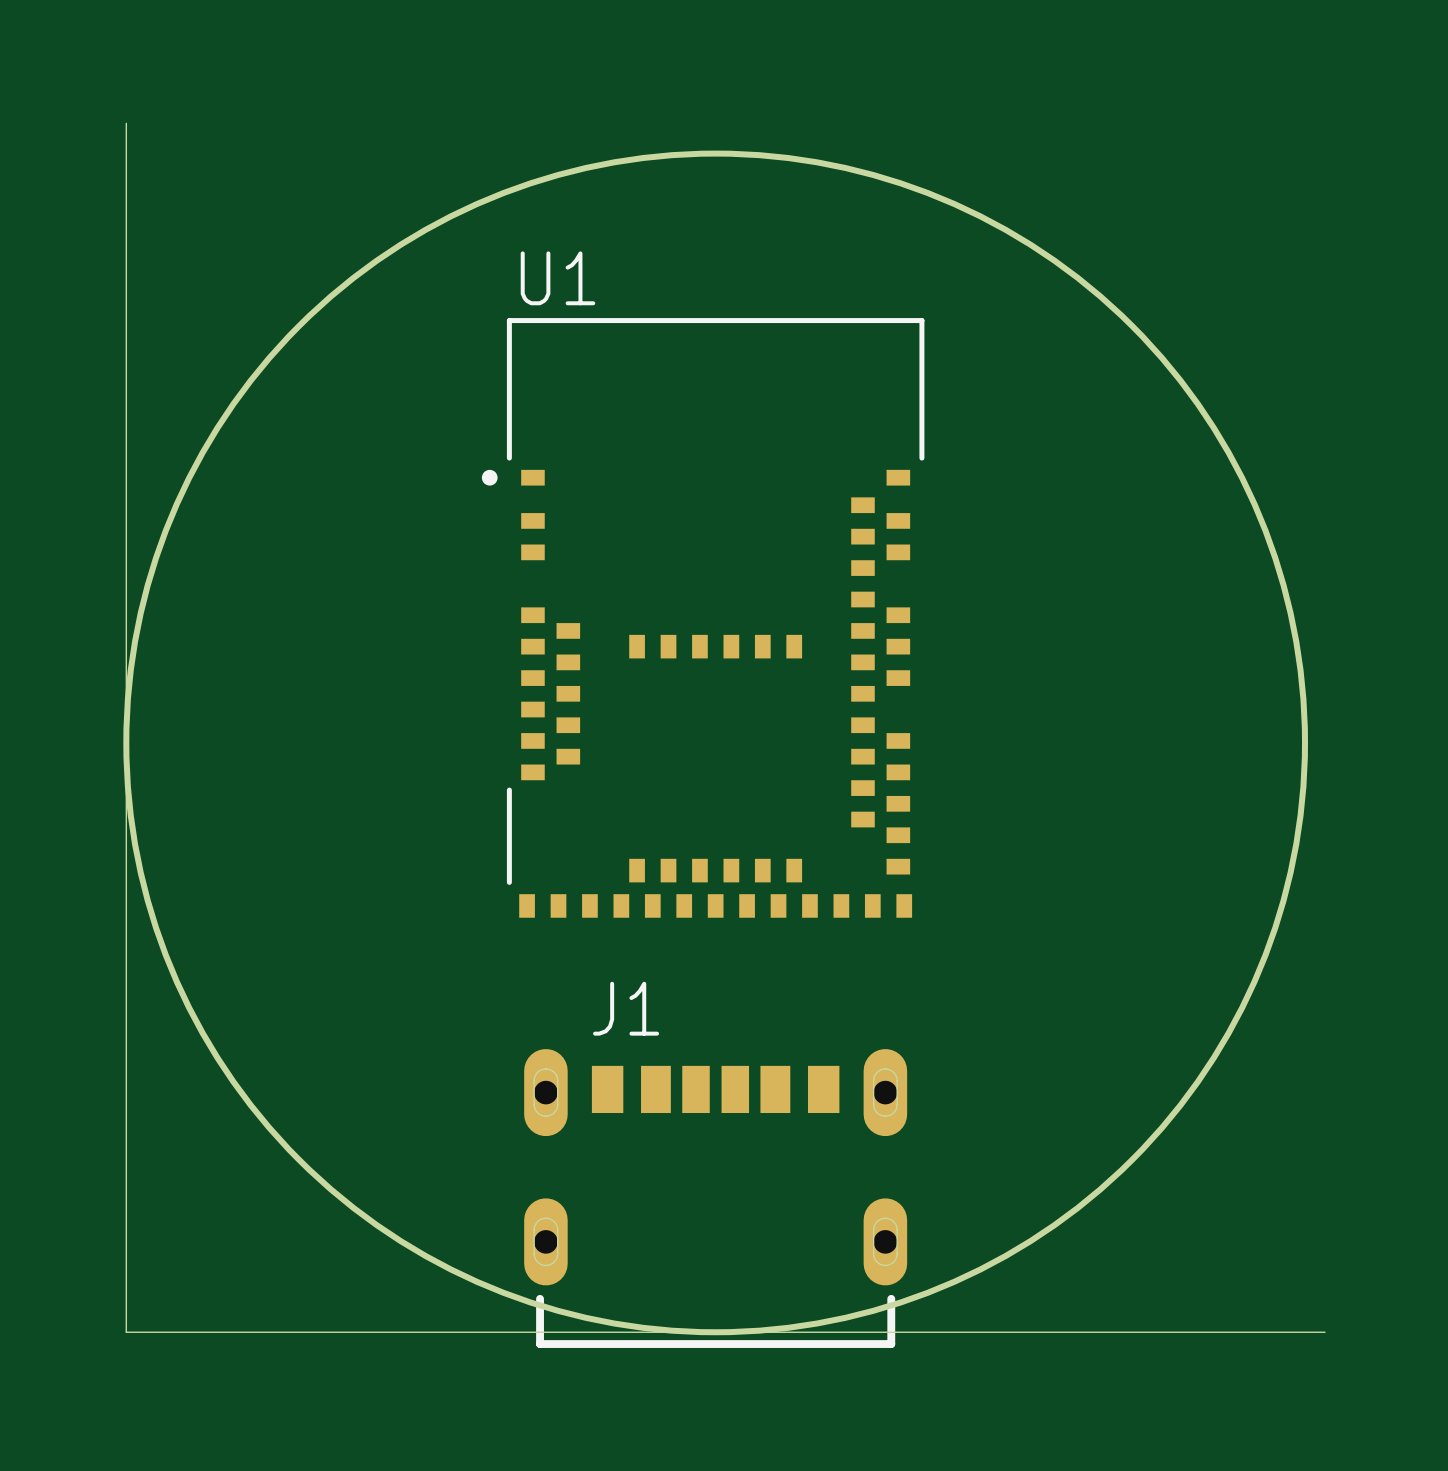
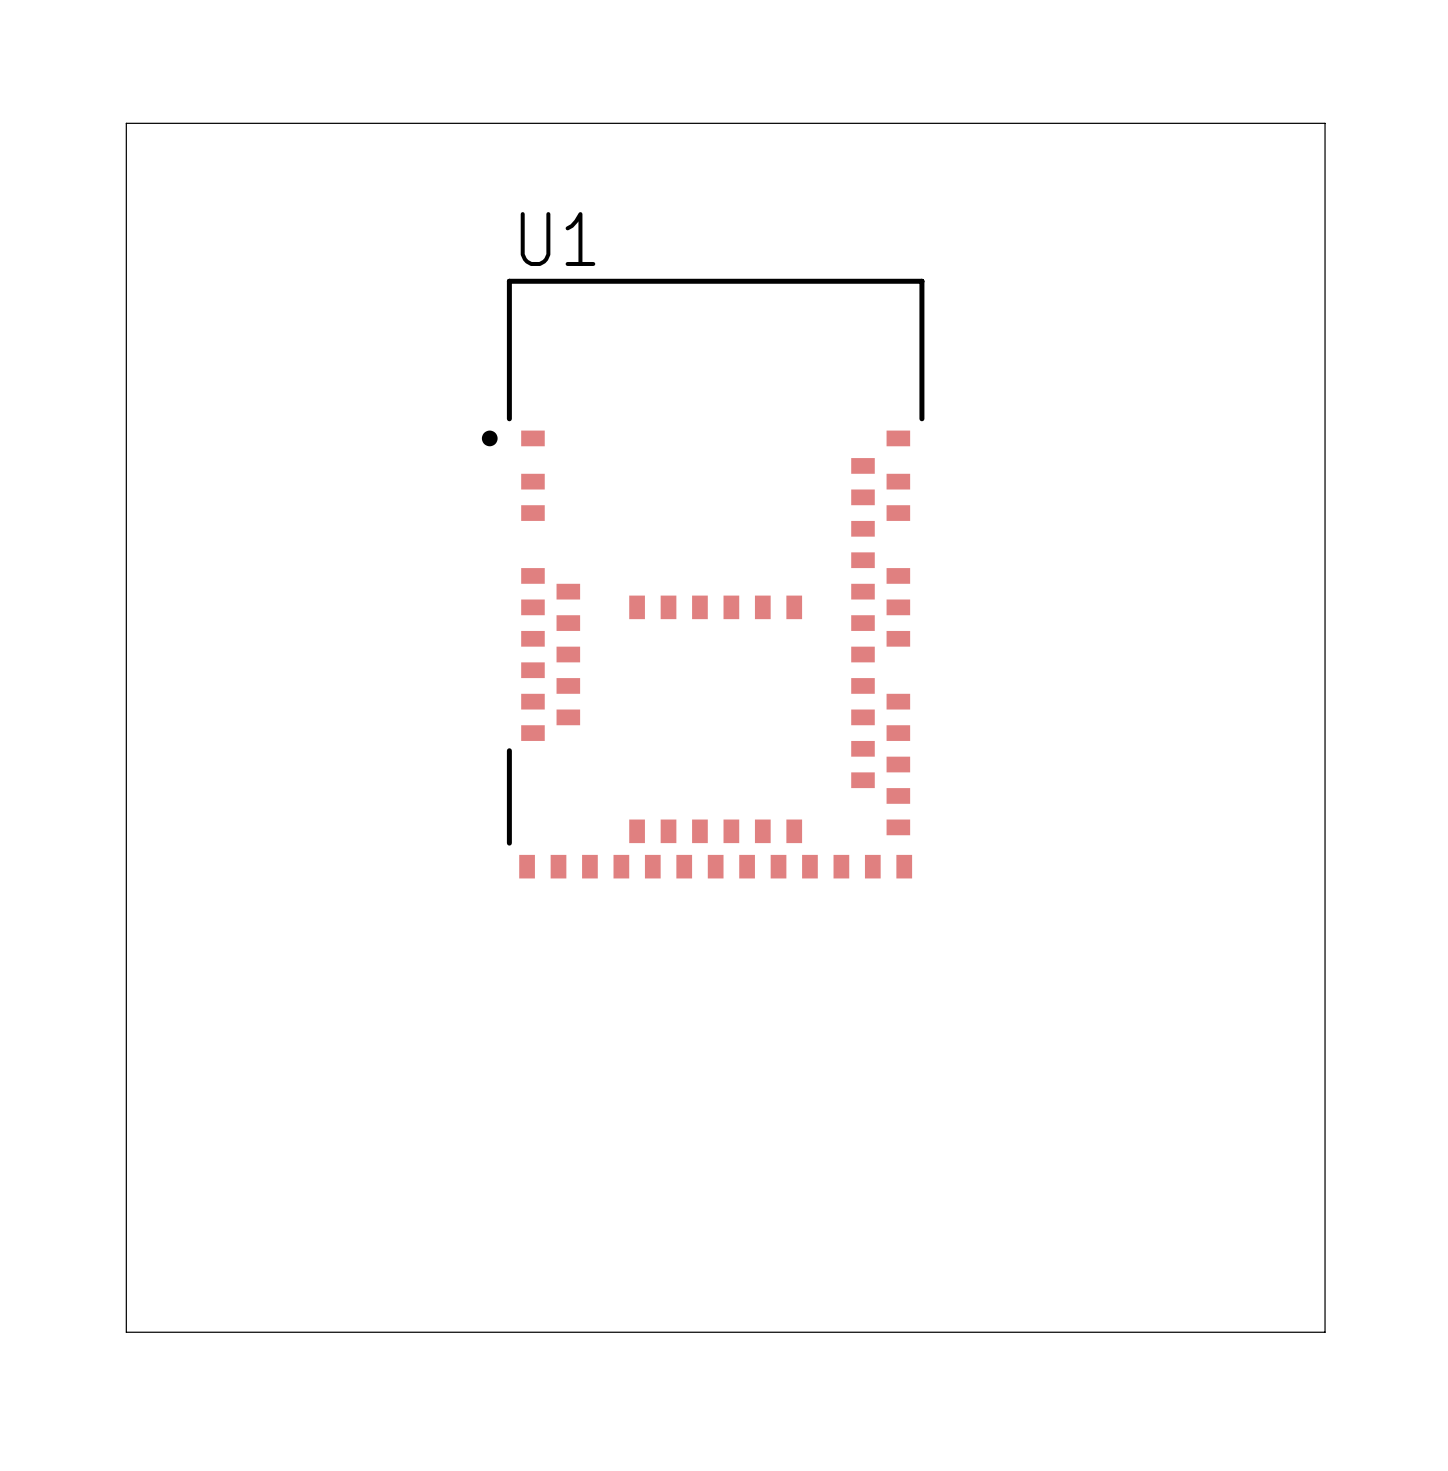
board edge: none -> (126, 123) (1325, 123) (1325, 1332)
round board edge: [123, 150, 1308, 1336] -> none
U1 position: (703, 617) -> (703, 578)
J1: (715, 1198) -> none

